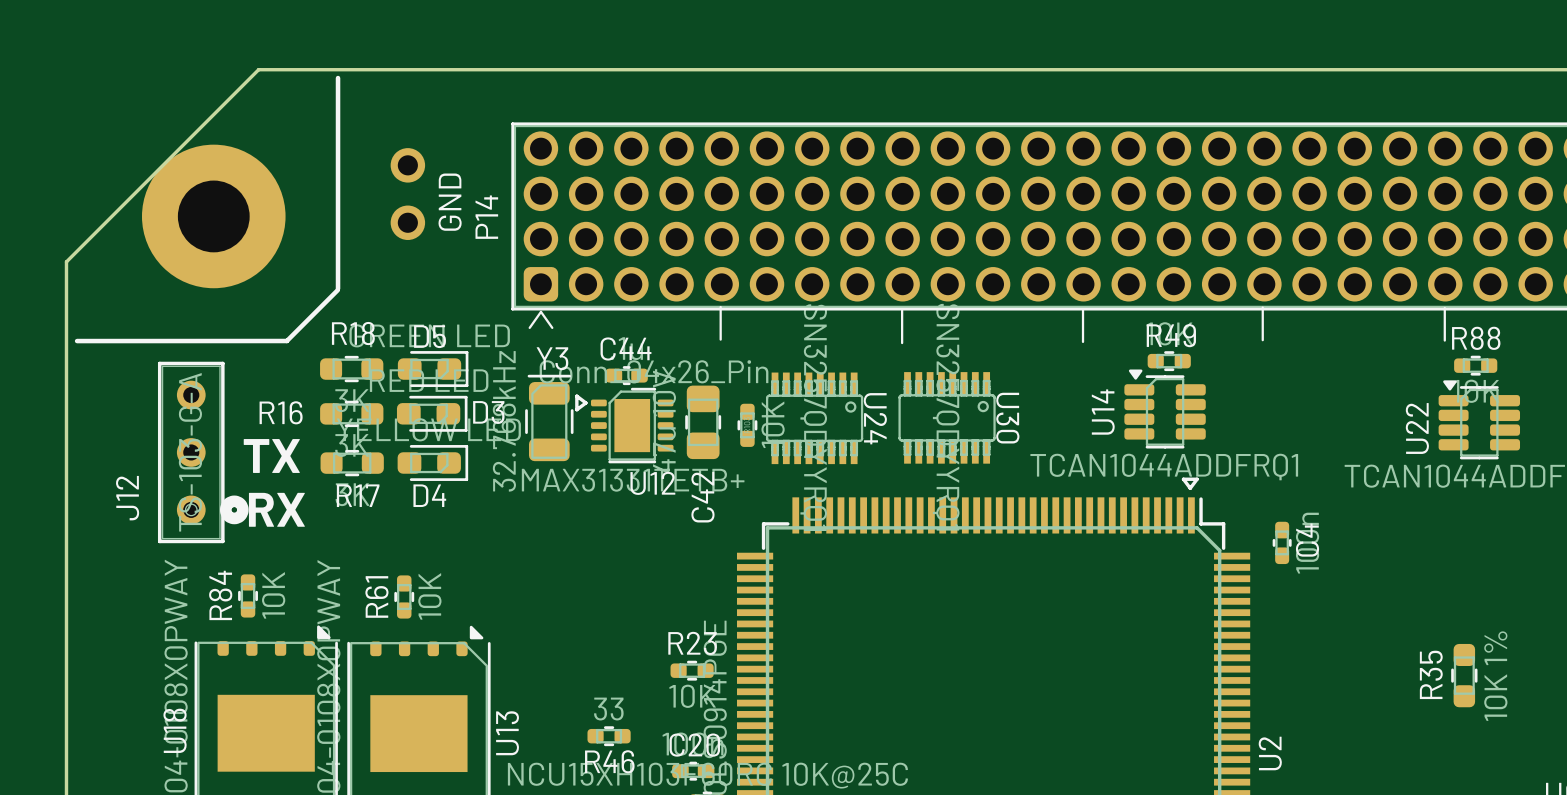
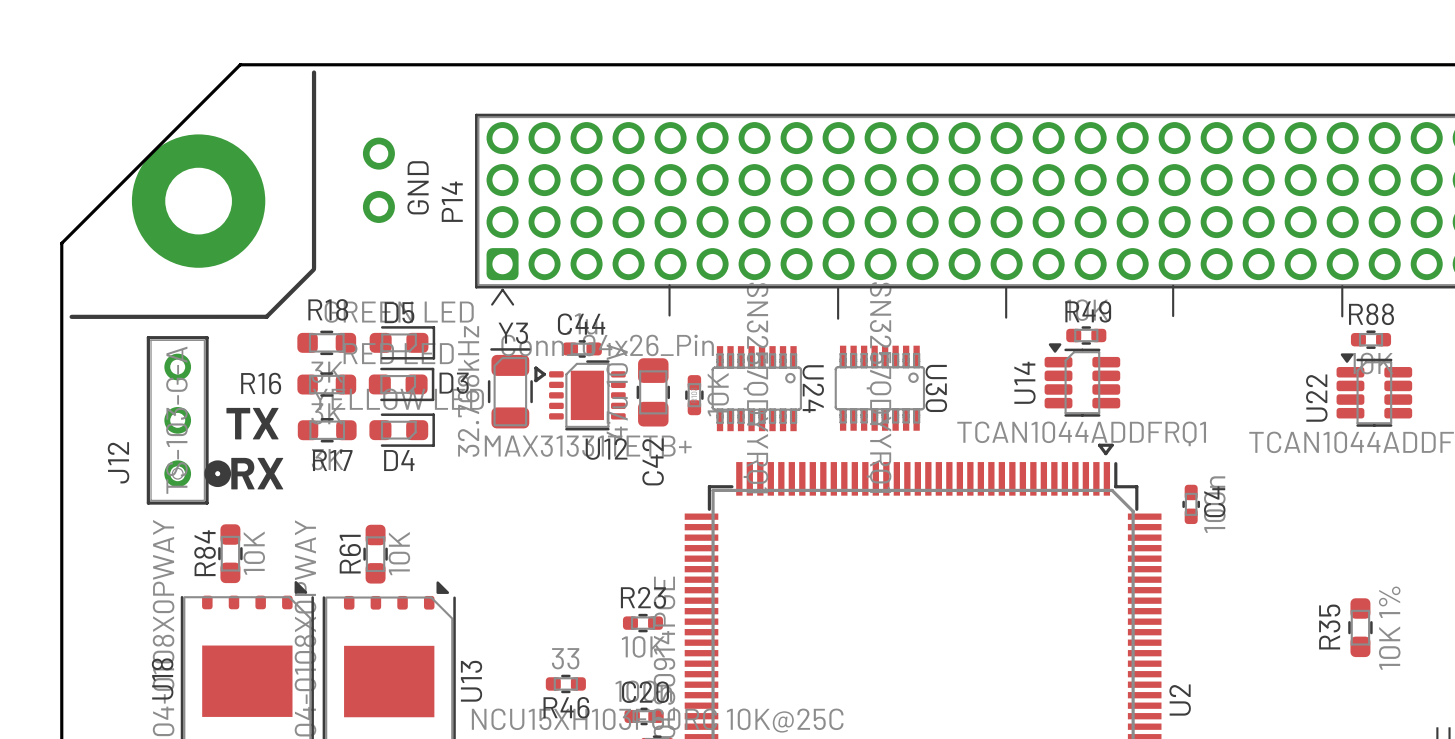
R84 footprint: [238, 574, 258, 618] -> [218, 524, 243, 584]
R61 footprint: [394, 575, 415, 619] -> [363, 524, 388, 584]

